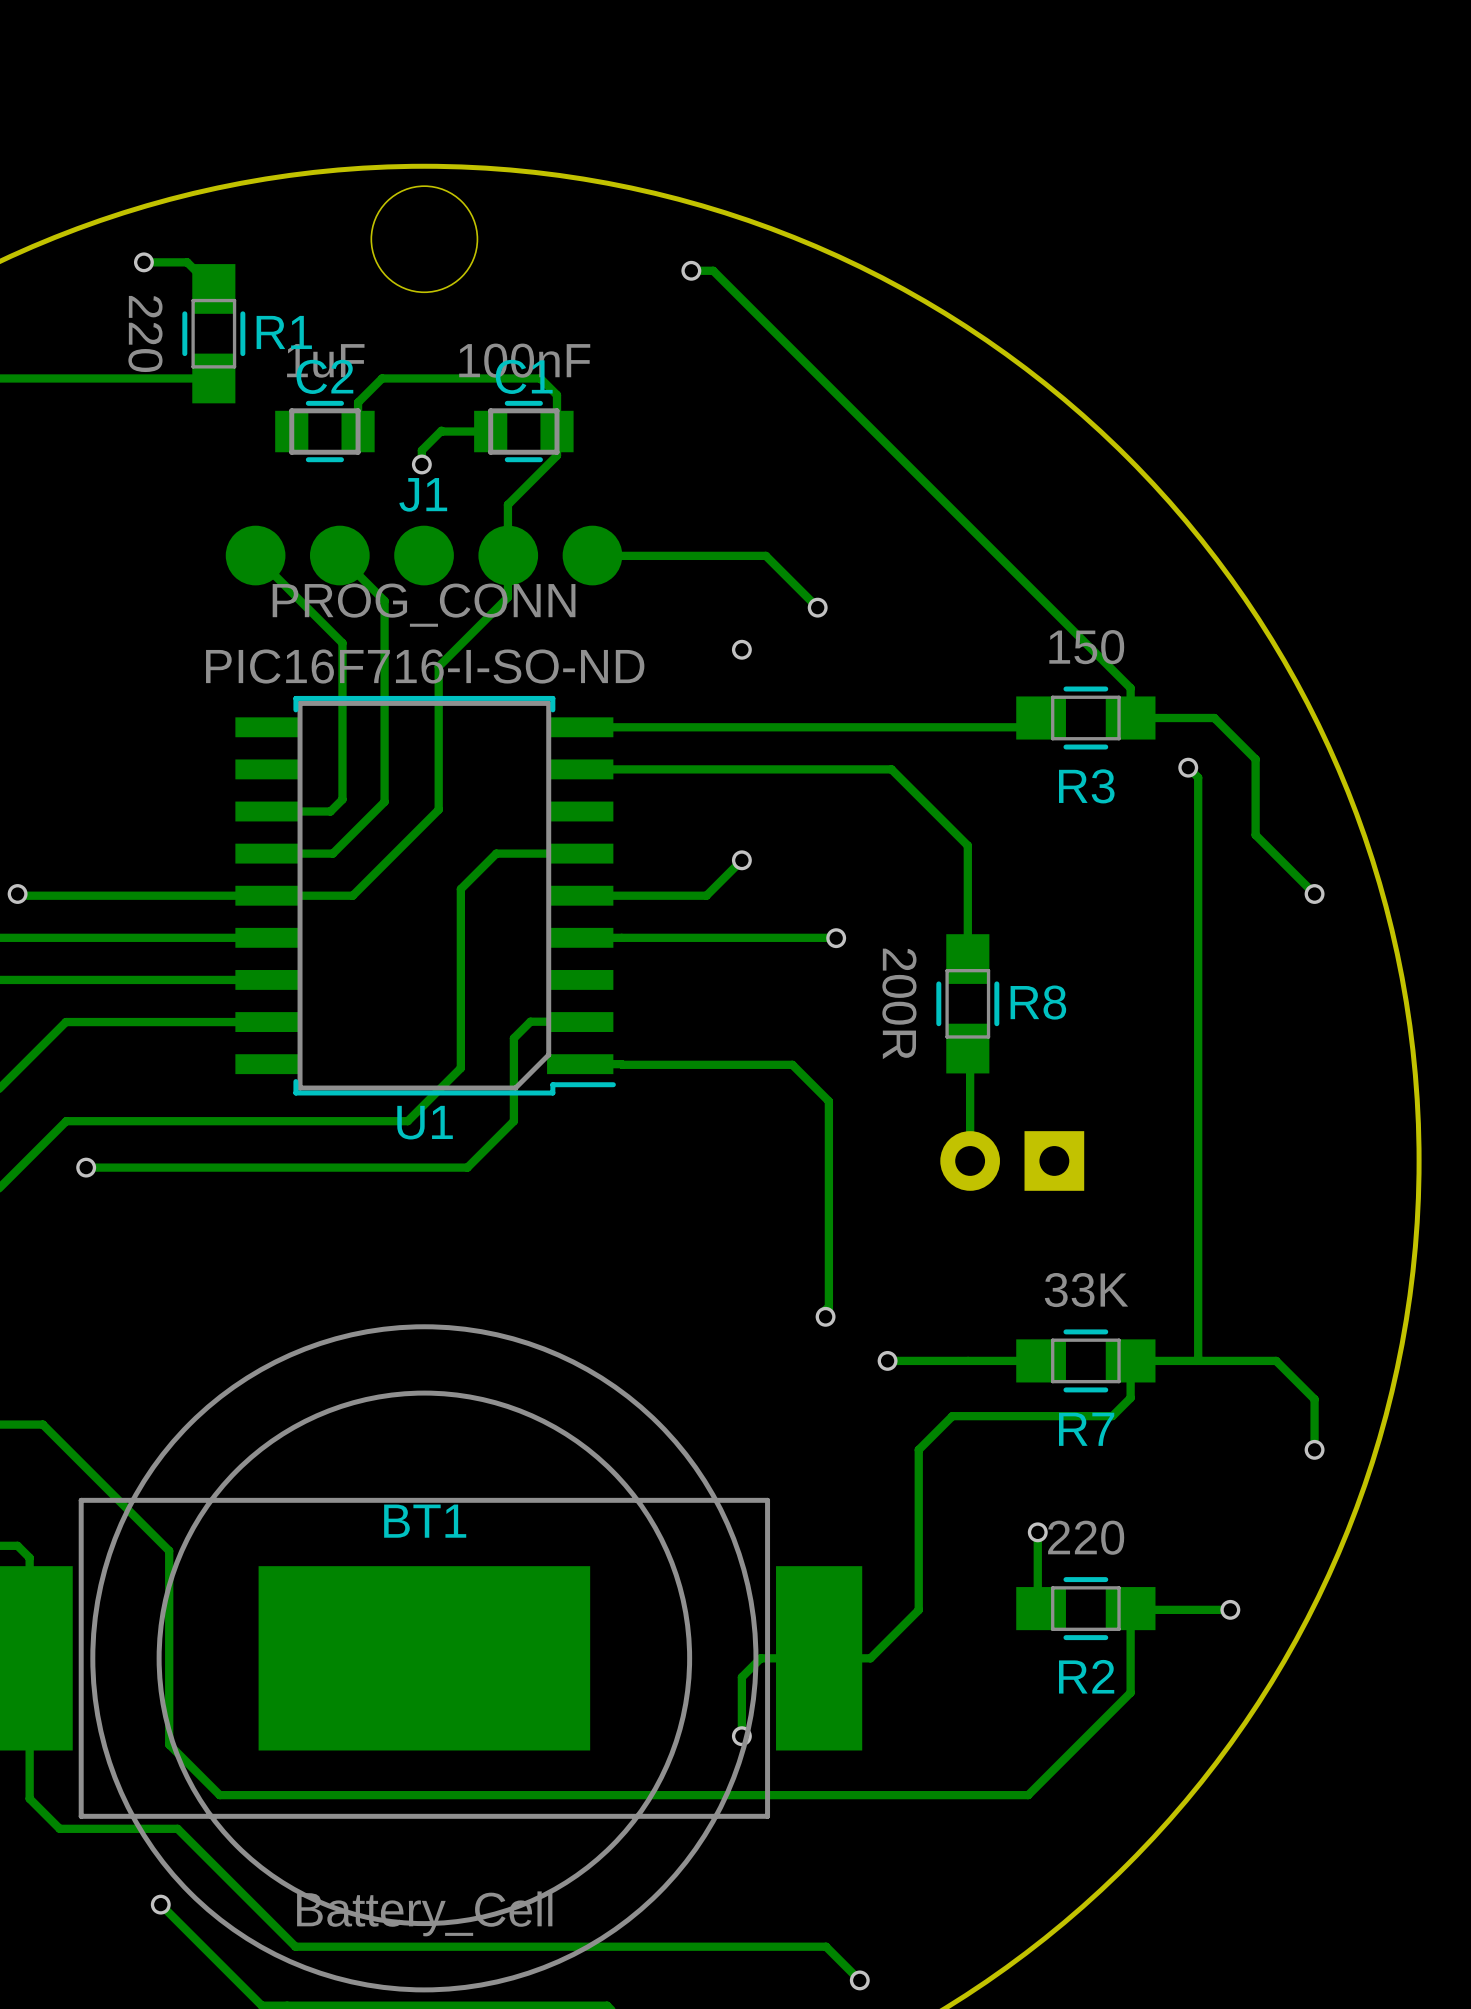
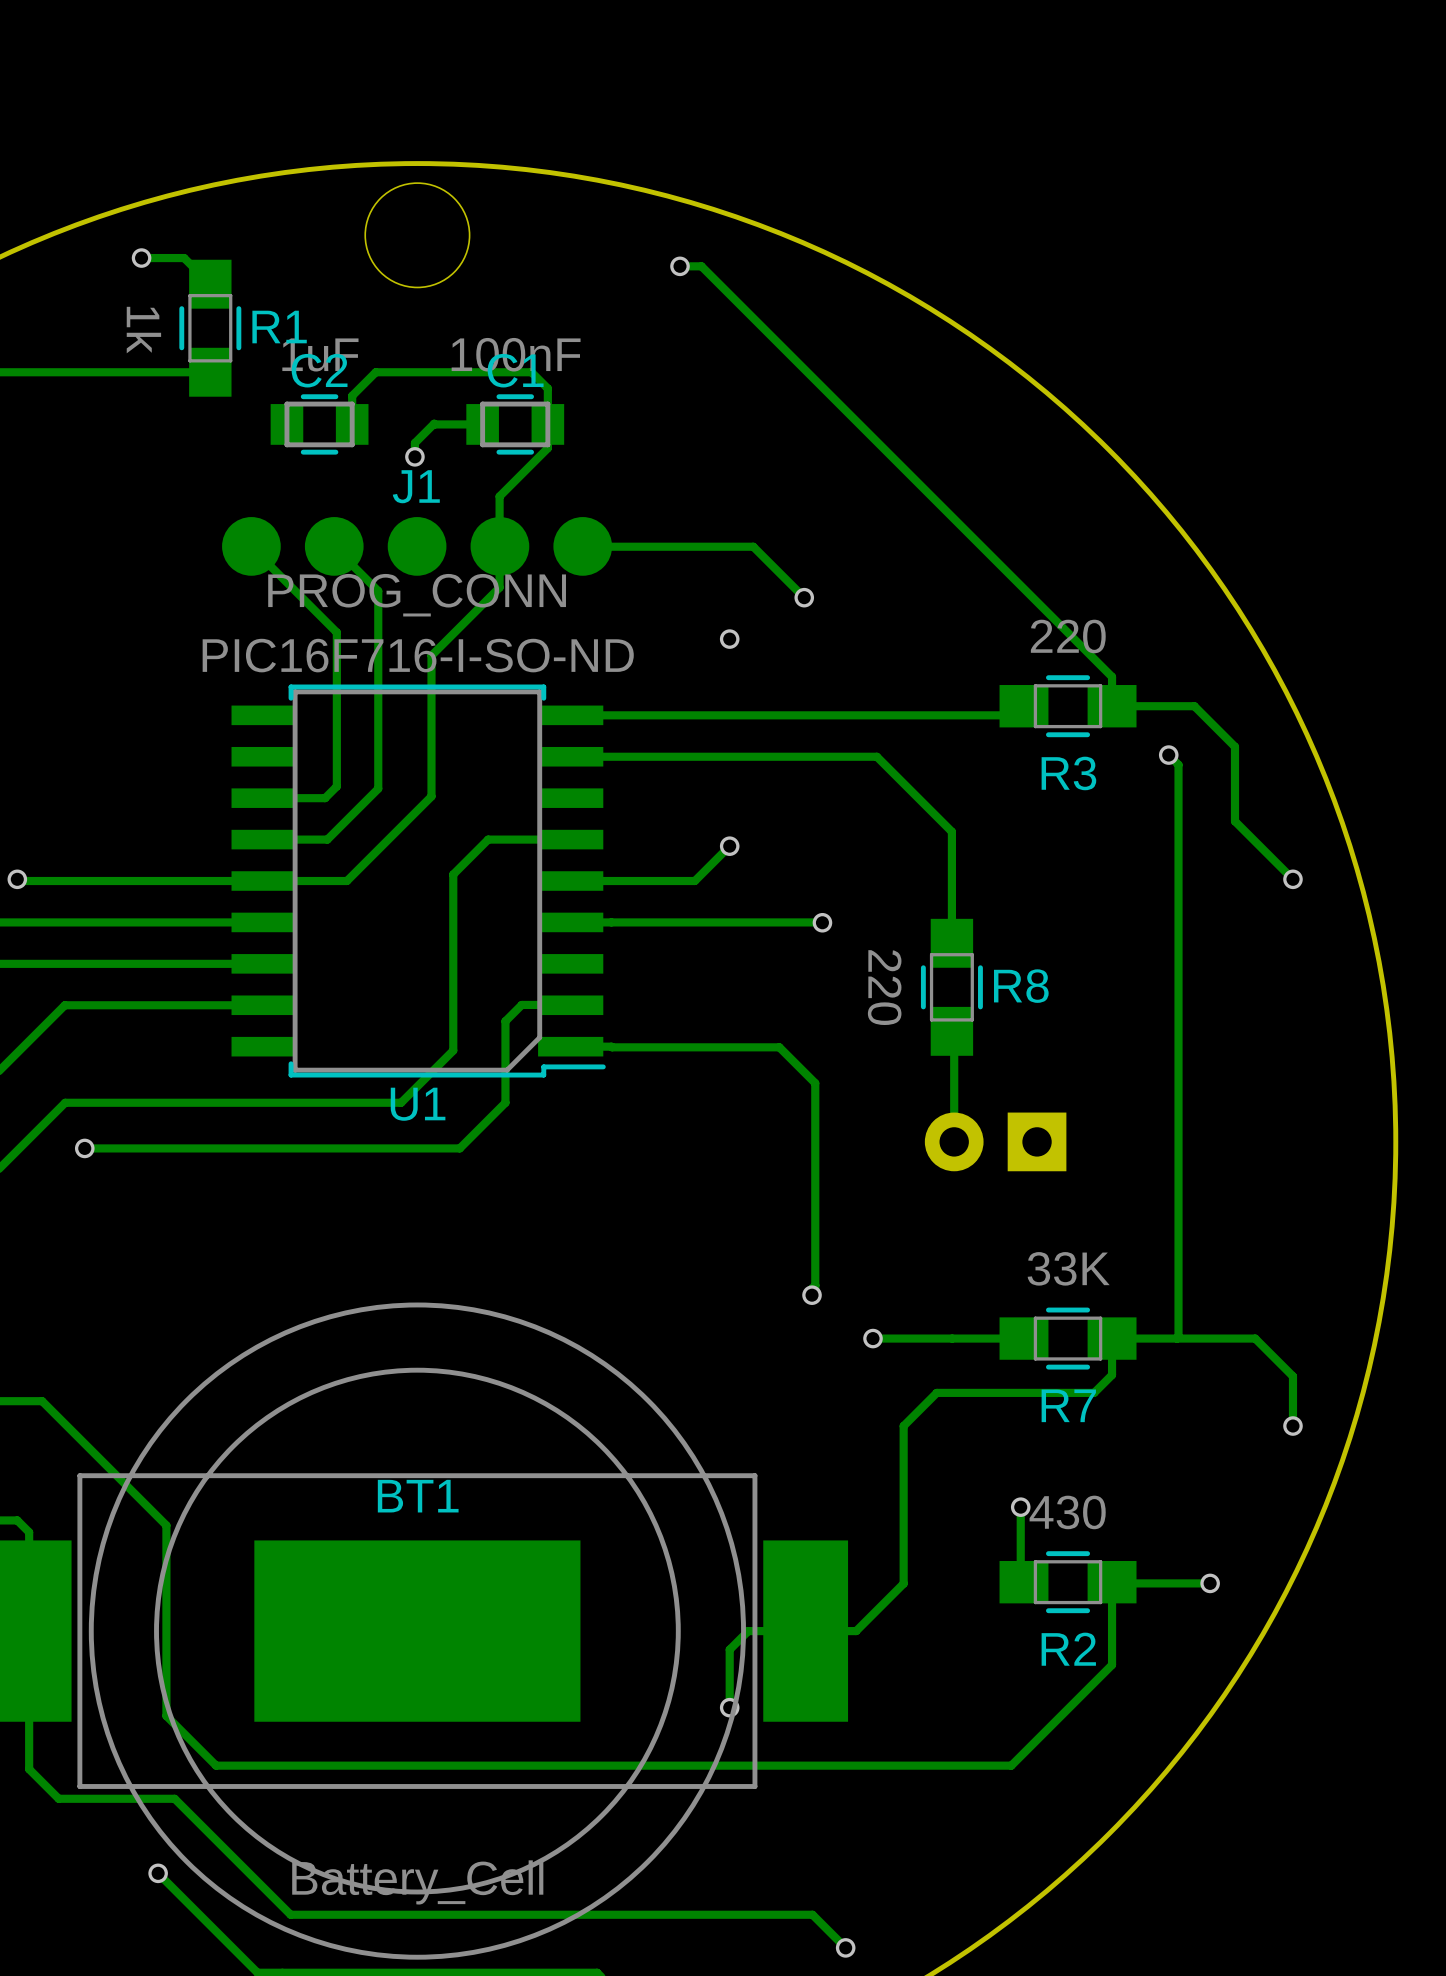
R1 value: 220 (145, 333) -> 1k (143, 330)
R3 value: 150 (1086, 647) -> 220 (1068, 636)
R8 value: 200R (899, 1003) -> 220 (884, 987)
R2 value: 220 (1086, 1537) -> 430 (1067, 1512)

